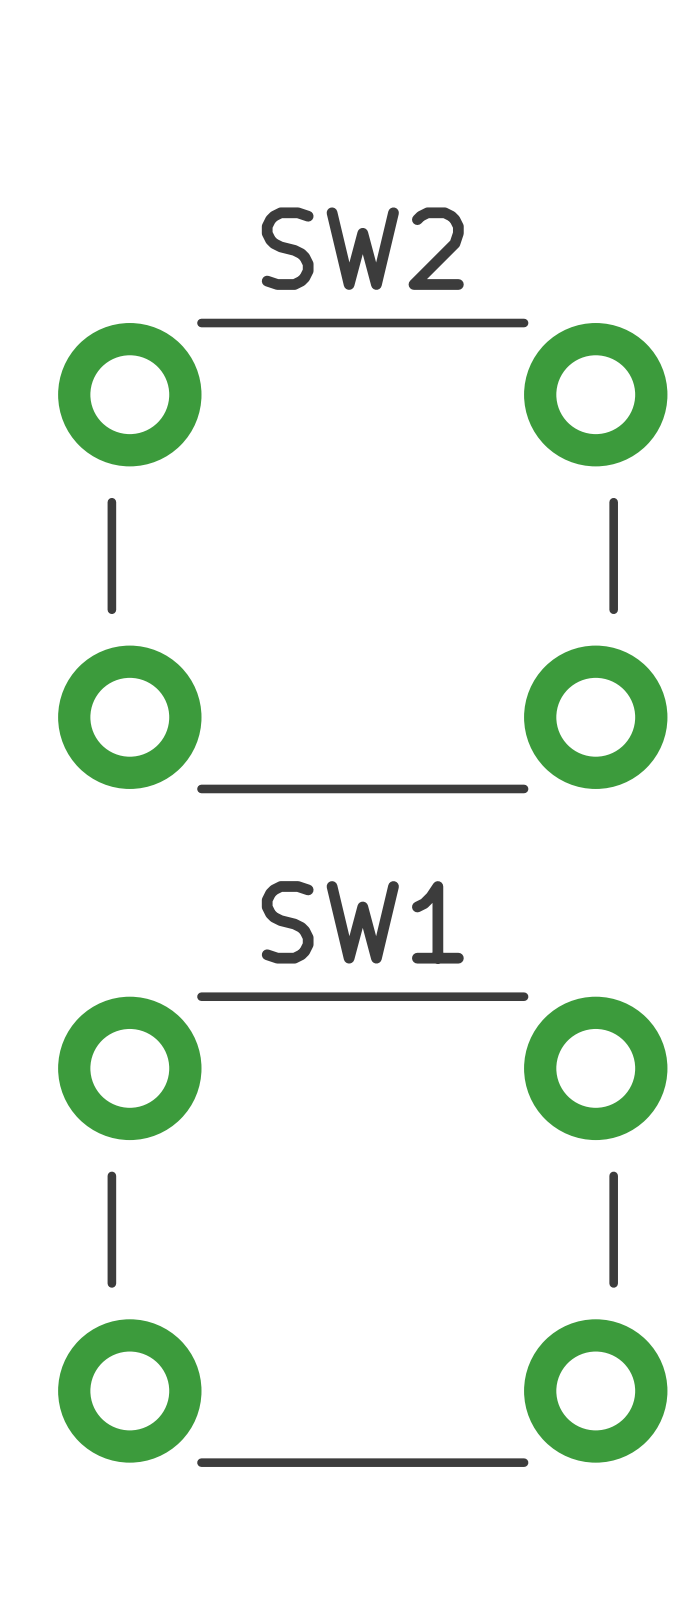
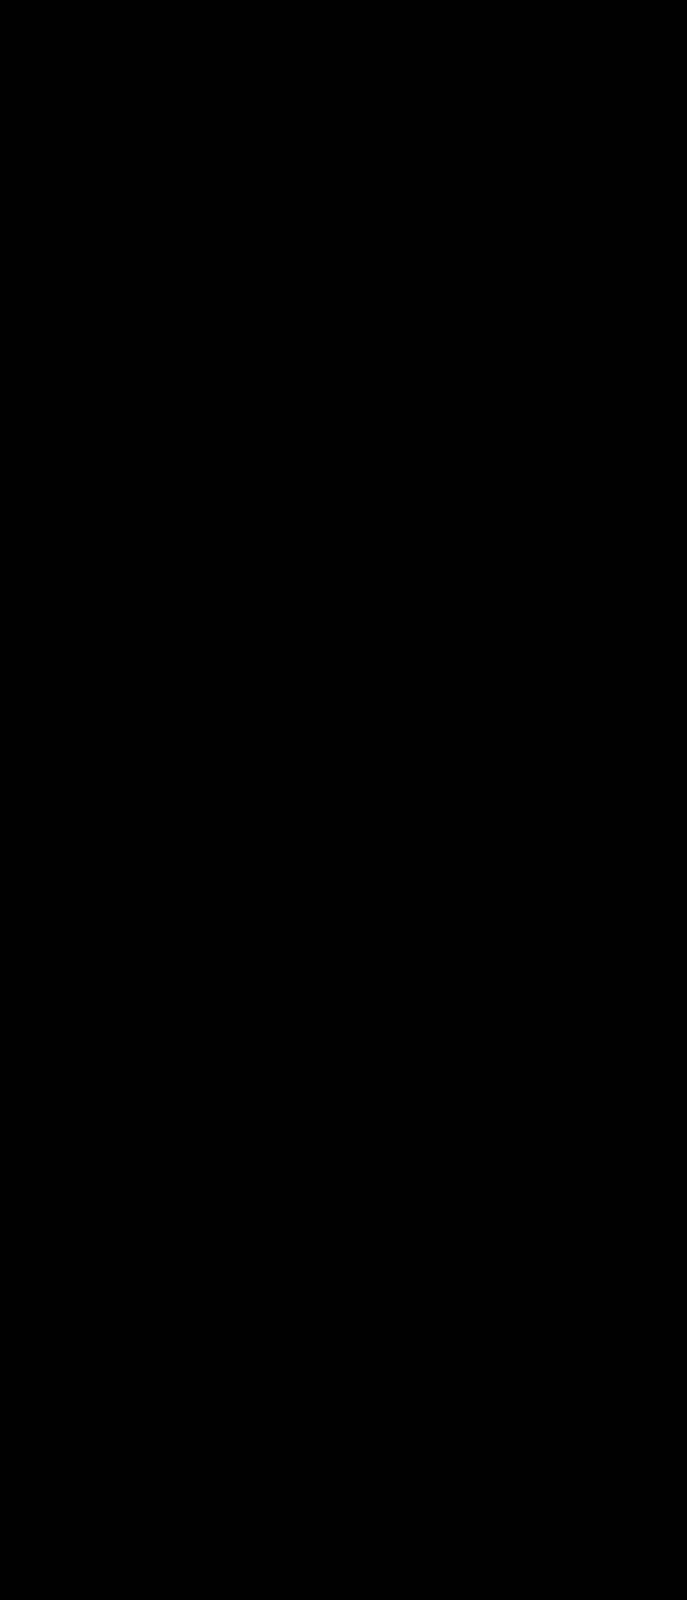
SW2: (362, 555) -> none
SW1: (362, 1229) -> none

